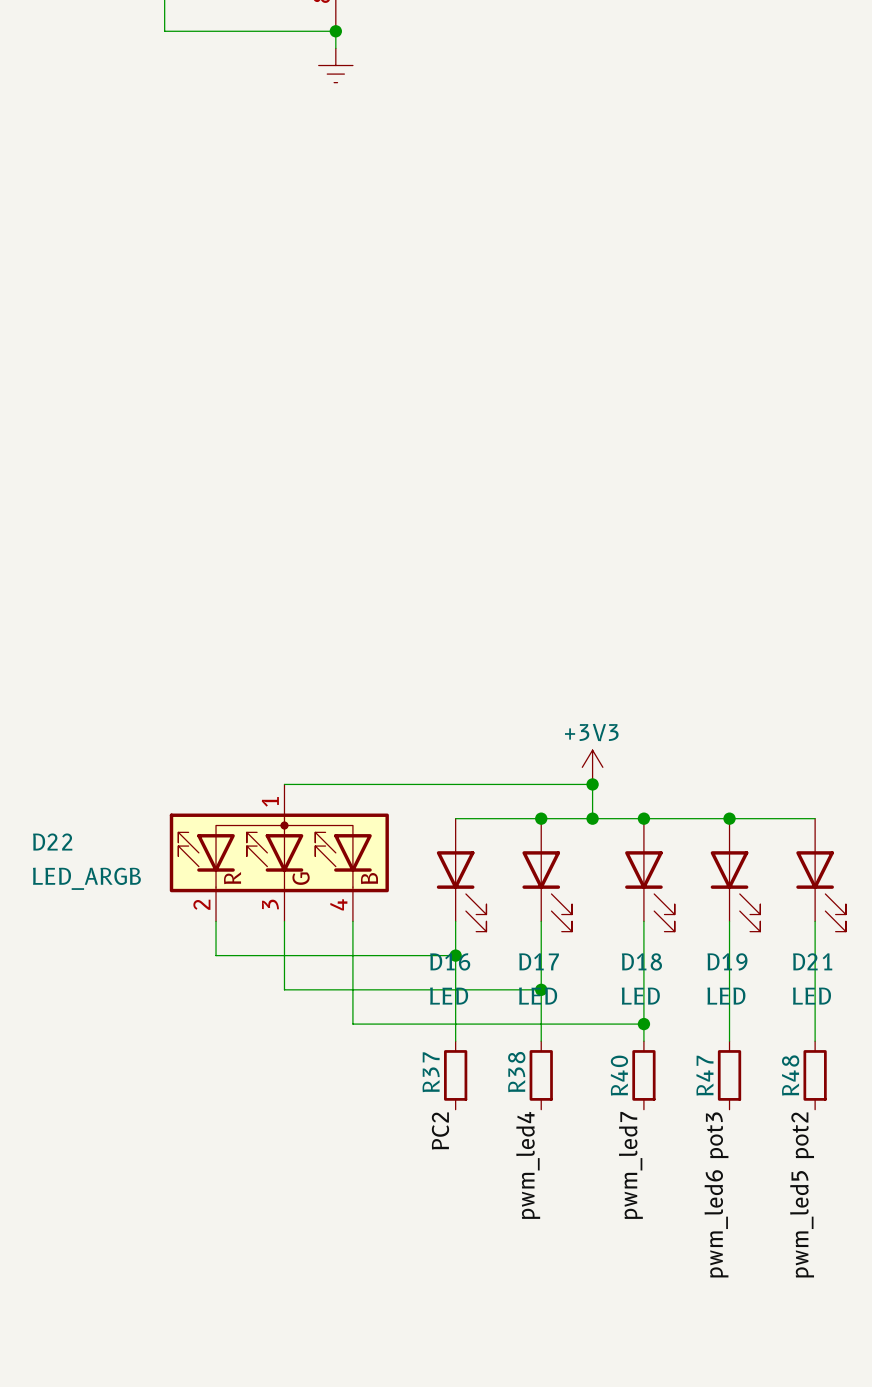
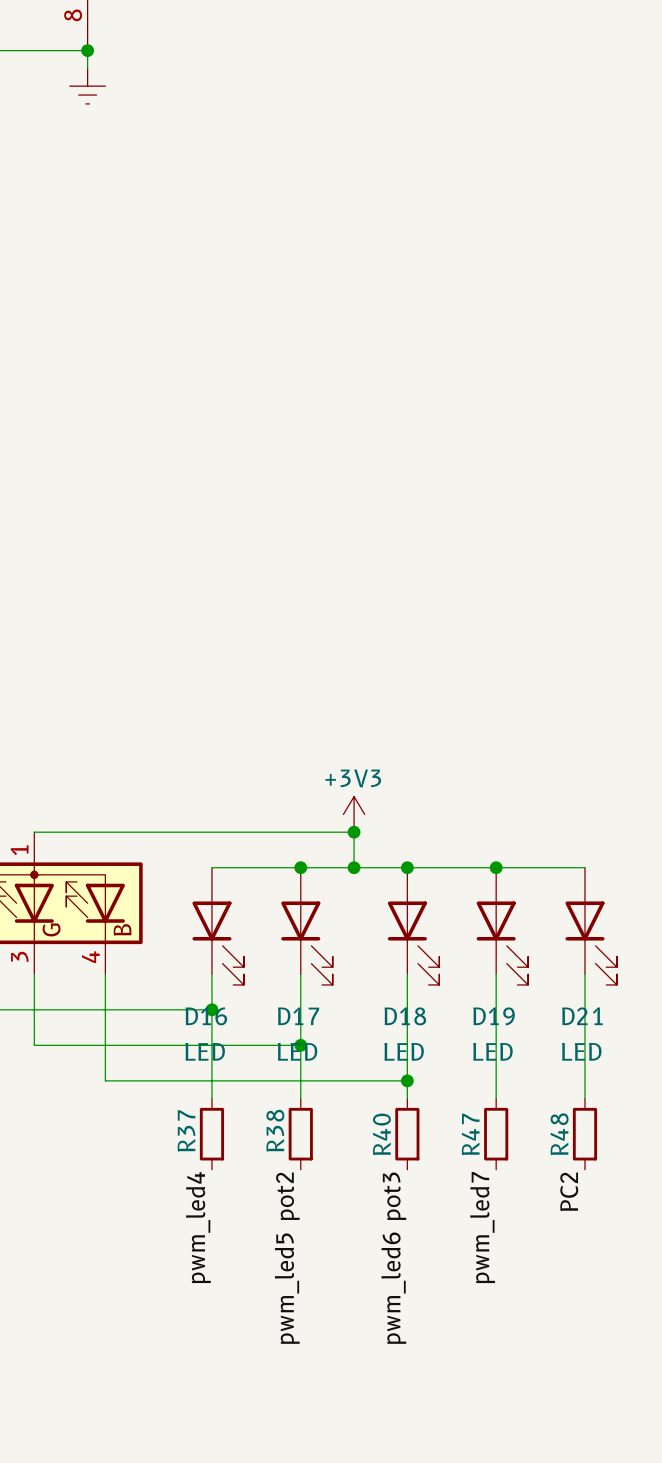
label: PC2 (440, 1130) -> pwm_led4 (198, 1227)
label: pwm_led4 (528, 1165) -> pwm_led5 pot2 (287, 1258)
label: pwm_led7 (630, 1165) -> pwm_led6 pot3 (393, 1258)
label: pwm_led6 pot3 (716, 1194) -> pwm_led7 (482, 1227)
label: pwm_led5 pot2 (802, 1194) -> PC2 (569, 1191)

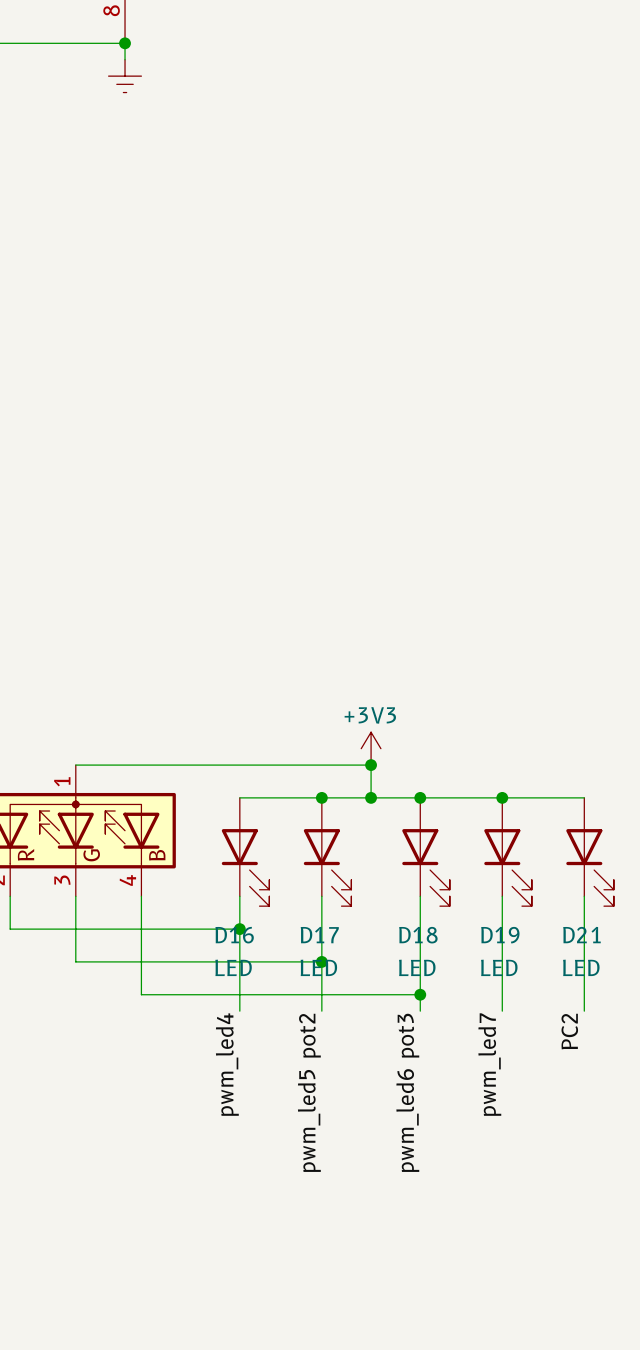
R37: (211, 1134) -> none
R38: (300, 1134) -> none
R40: (407, 1134) -> none
R47: (496, 1134) -> none
R48: (584, 1134) -> none
label position: PC2 (569, 1191) -> PC2 (569, 1031)
label position: pwm_led4 (198, 1227) -> pwm_led4 (227, 1064)
label position: pwm_led7 (482, 1227) -> pwm_led7 (489, 1064)
label position: pwm_led5 pot2 (287, 1258) -> pwm_led5 pot2 (309, 1092)
label position: pwm_led6 pot3 (393, 1258) -> pwm_led6 pot3 (407, 1092)

